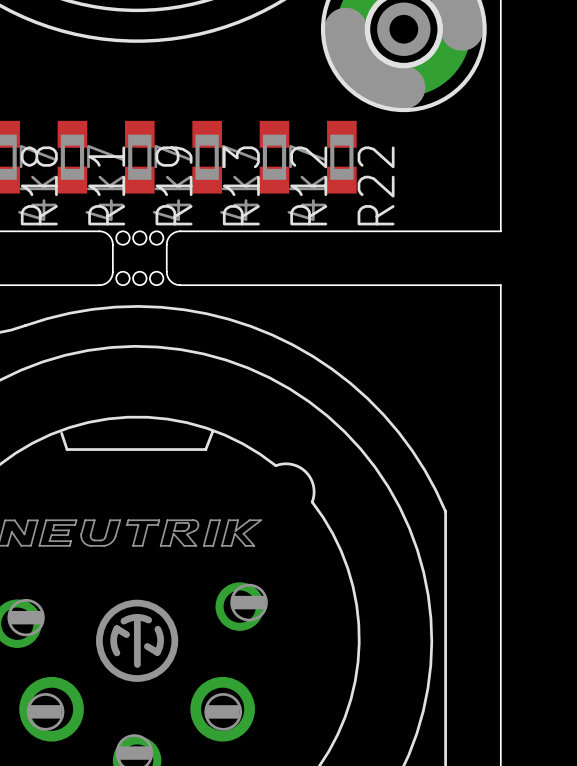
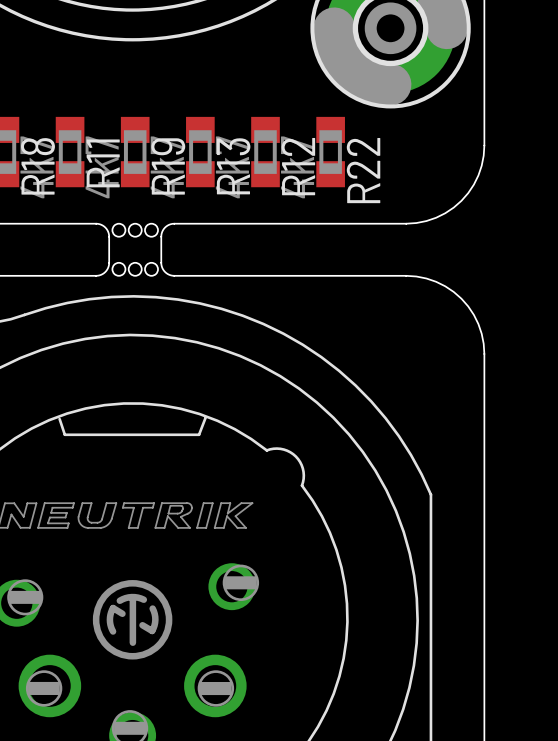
board edge: (500, 150) (500, 231) (419, 231) -> (484, 145) (478, 175) (461, 200) (436, 217) (406, 223)
board edge: (419, 285) (500, 285) (500, 366) -> (406, 275) (436, 281) (461, 298) (478, 324) (484, 353)

